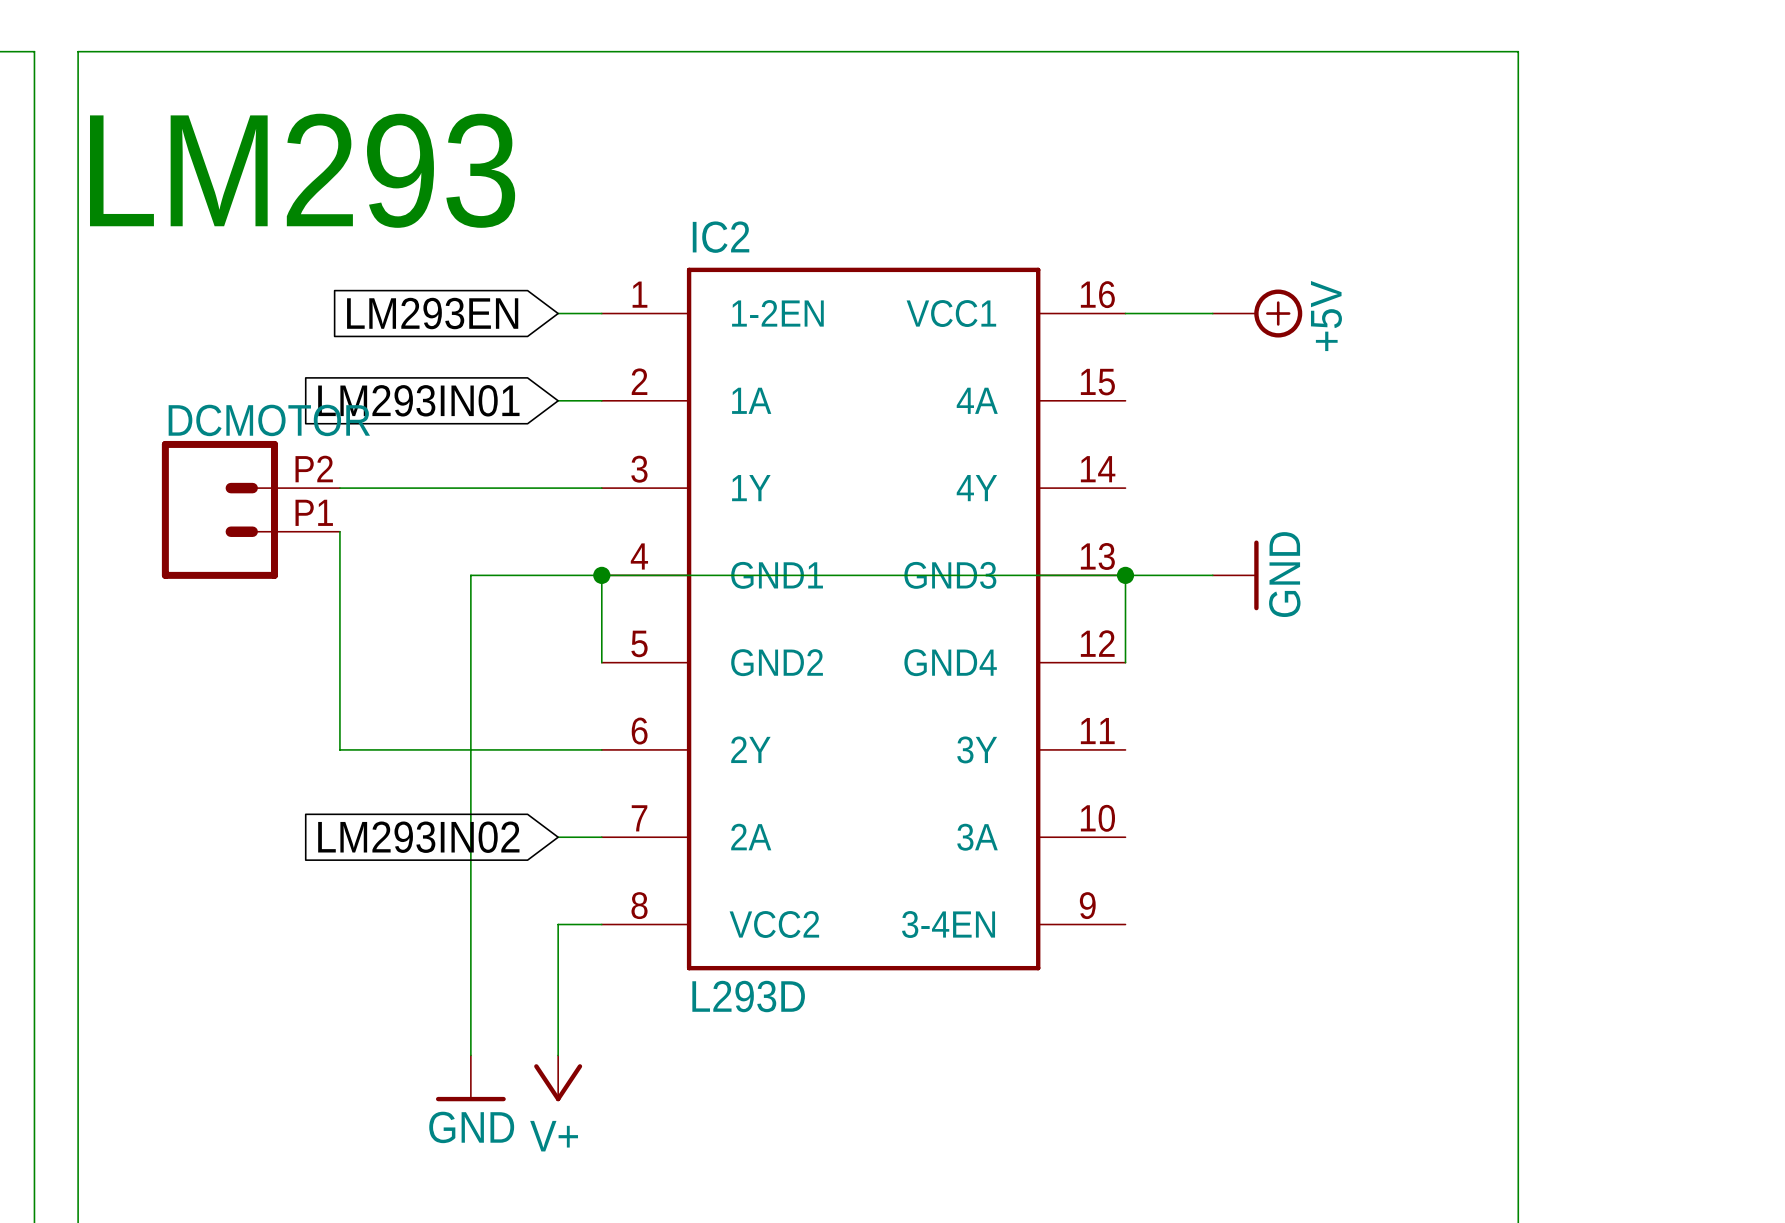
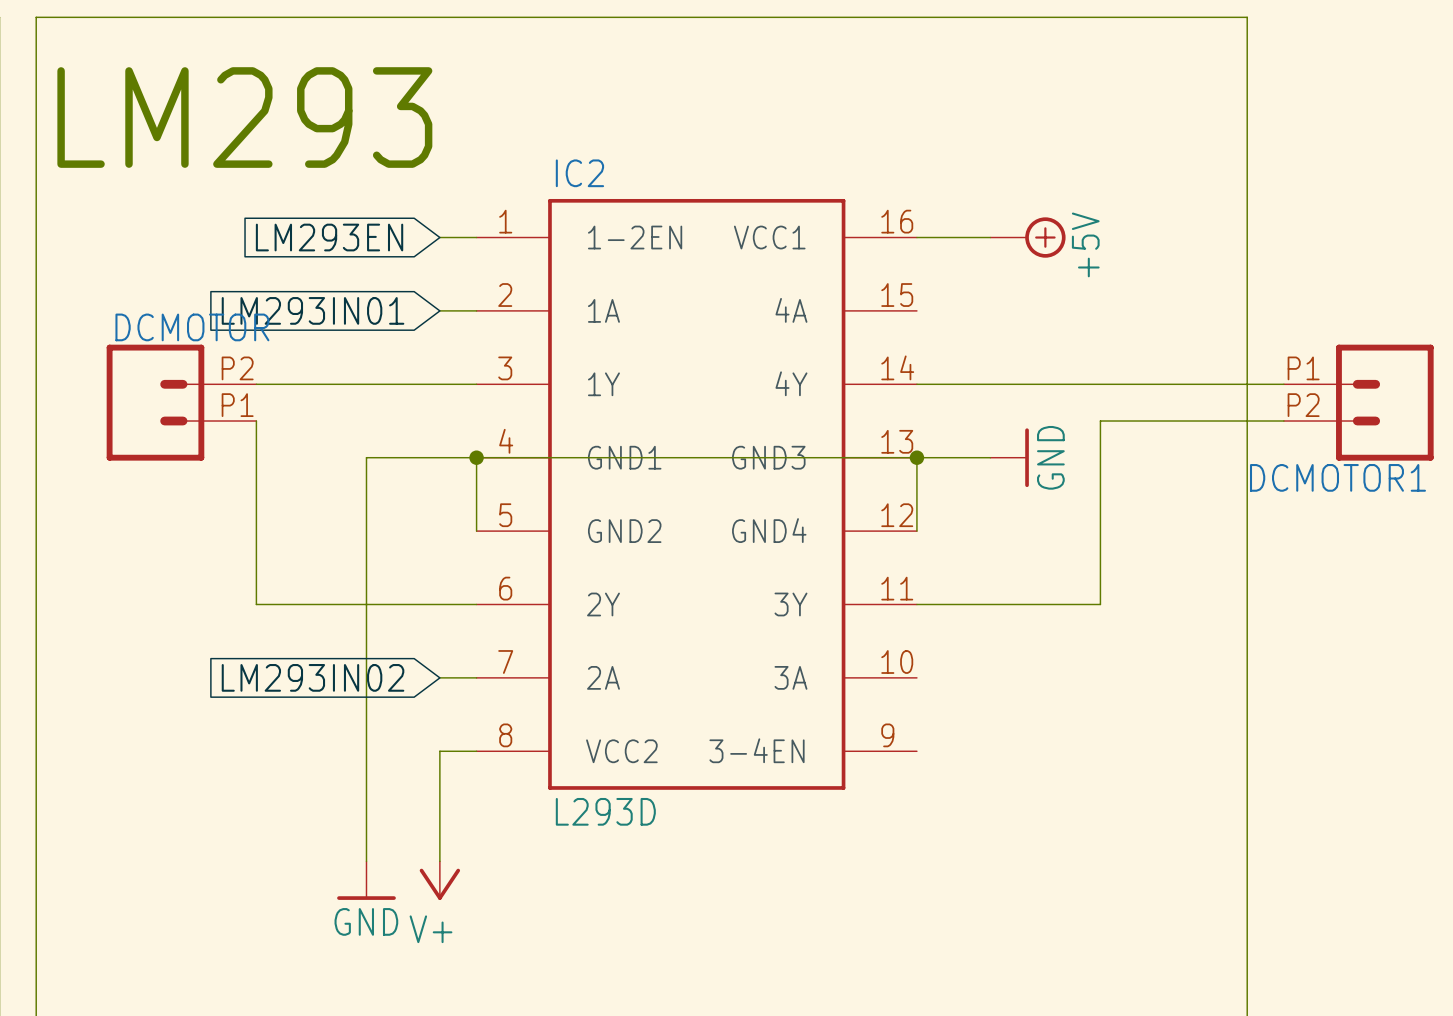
wire: none -> (916, 384) (1283, 384)
DCMOTOR1: none -> (1358, 402)
wire: none -> (1283, 421) (1100, 421) (1100, 604) (916, 604)

